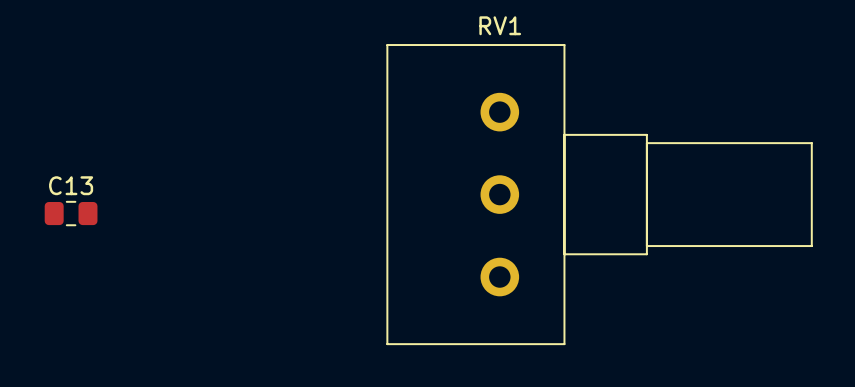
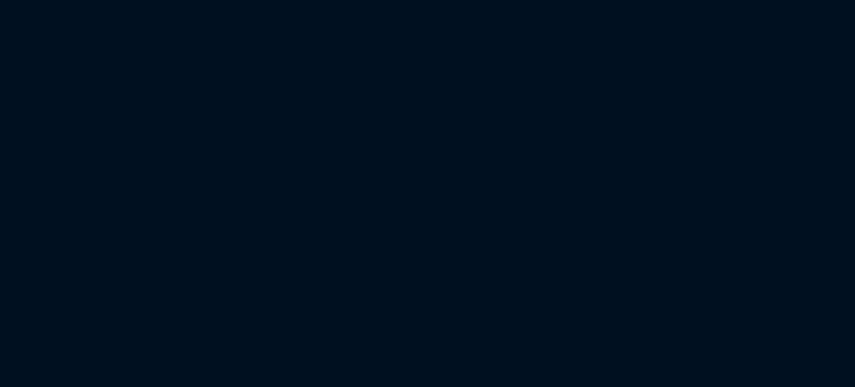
RV1: (599, 194) -> none
C13: (71, 213) -> none

